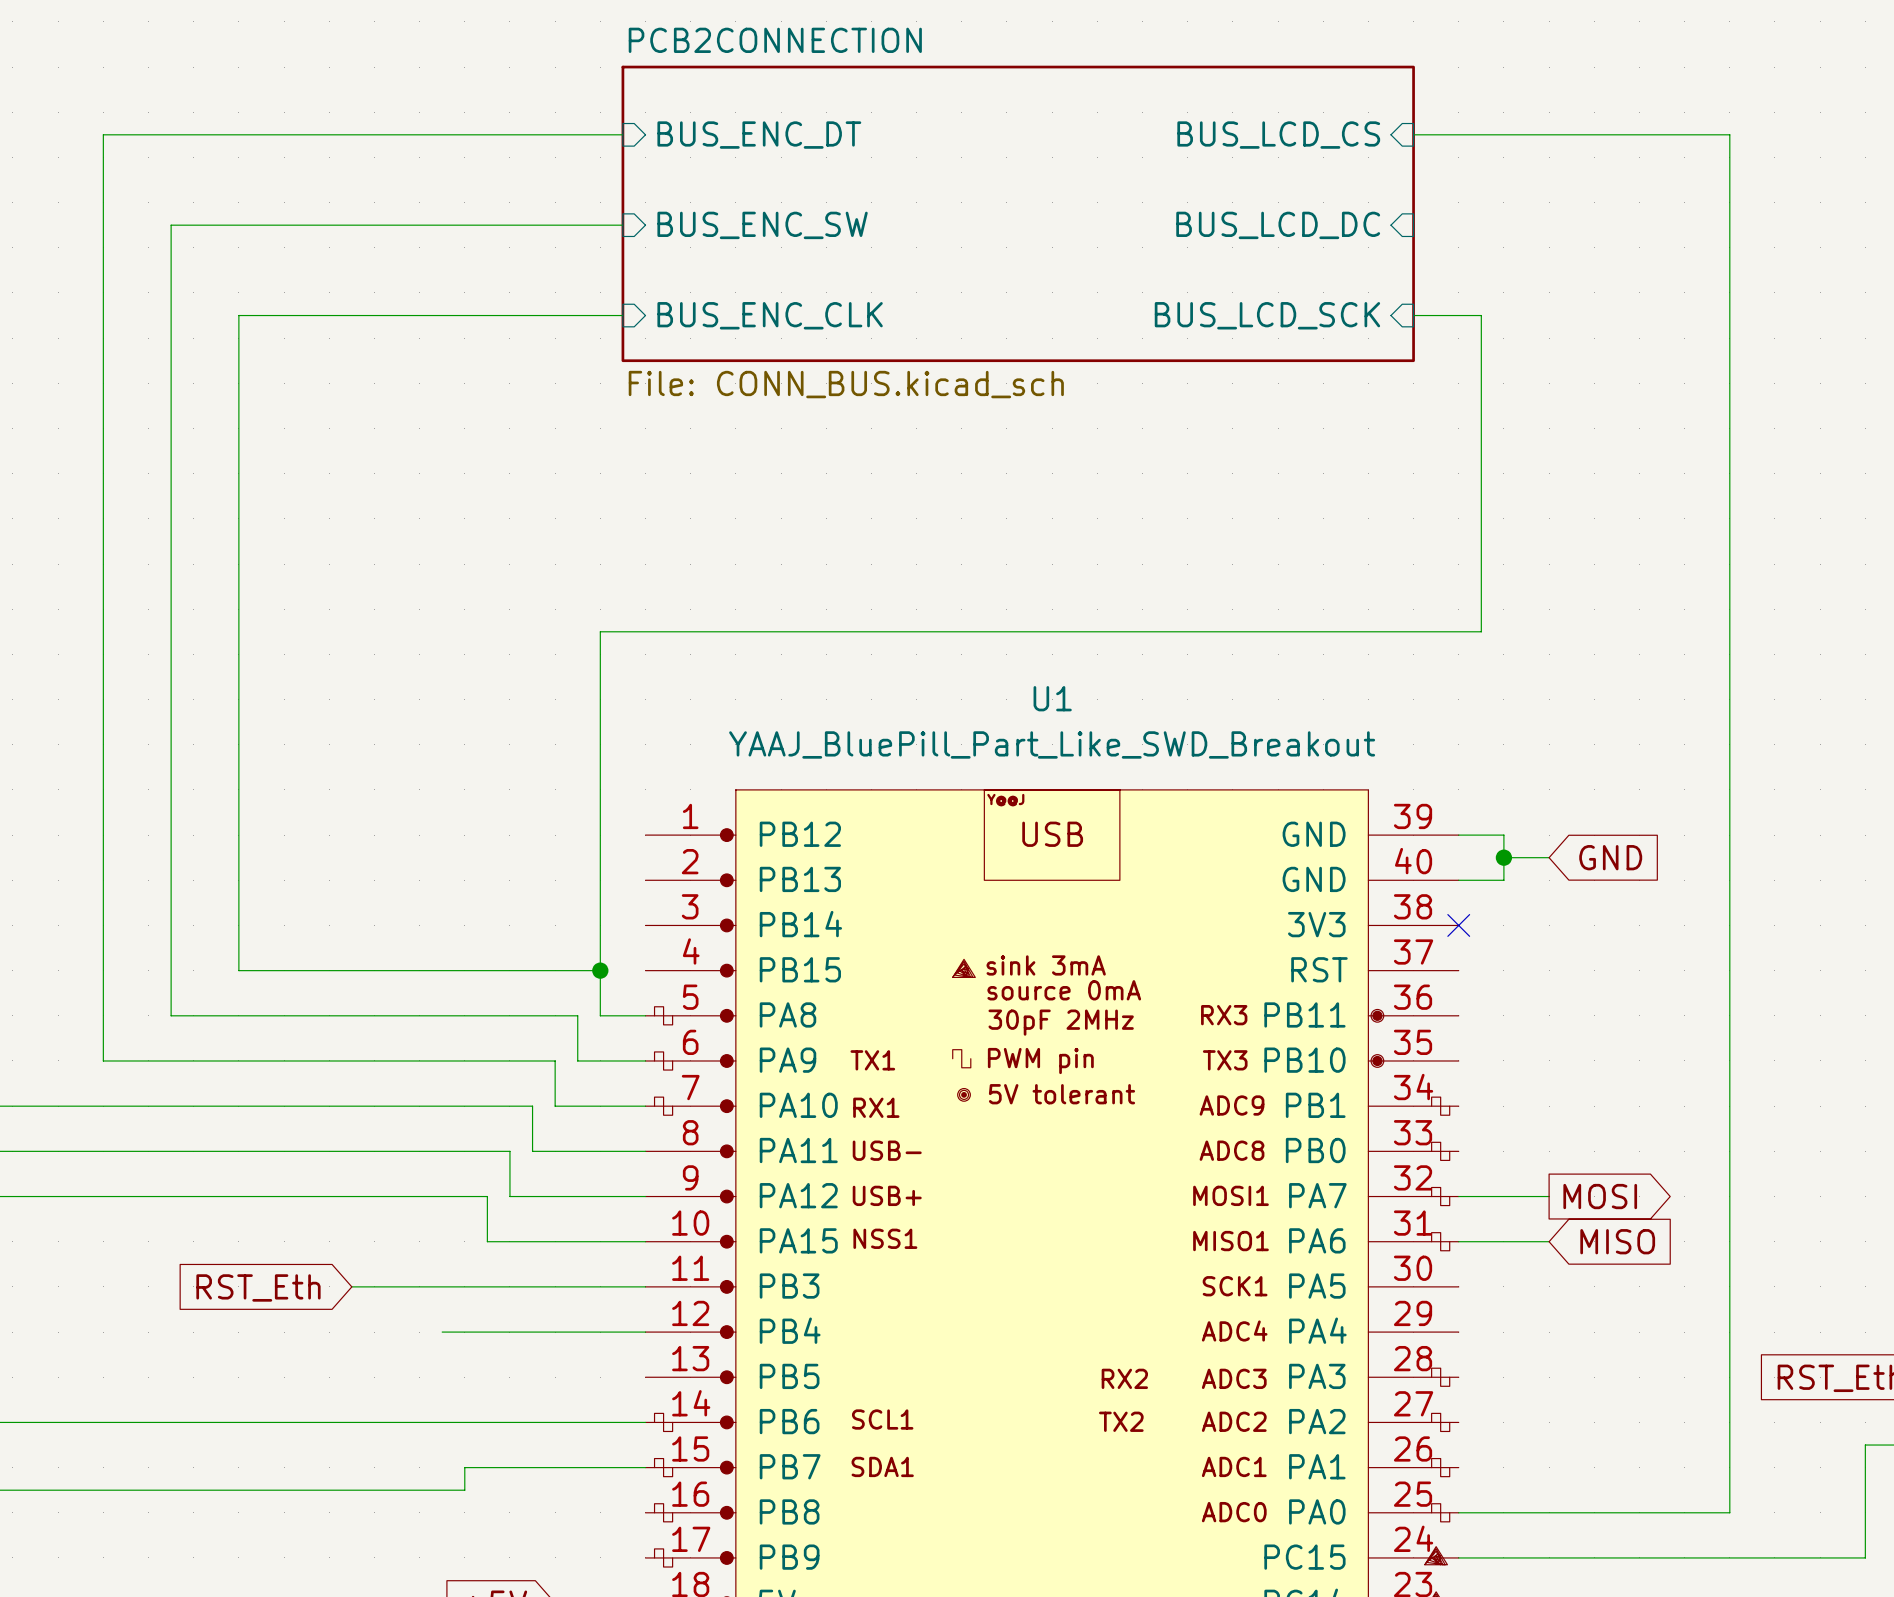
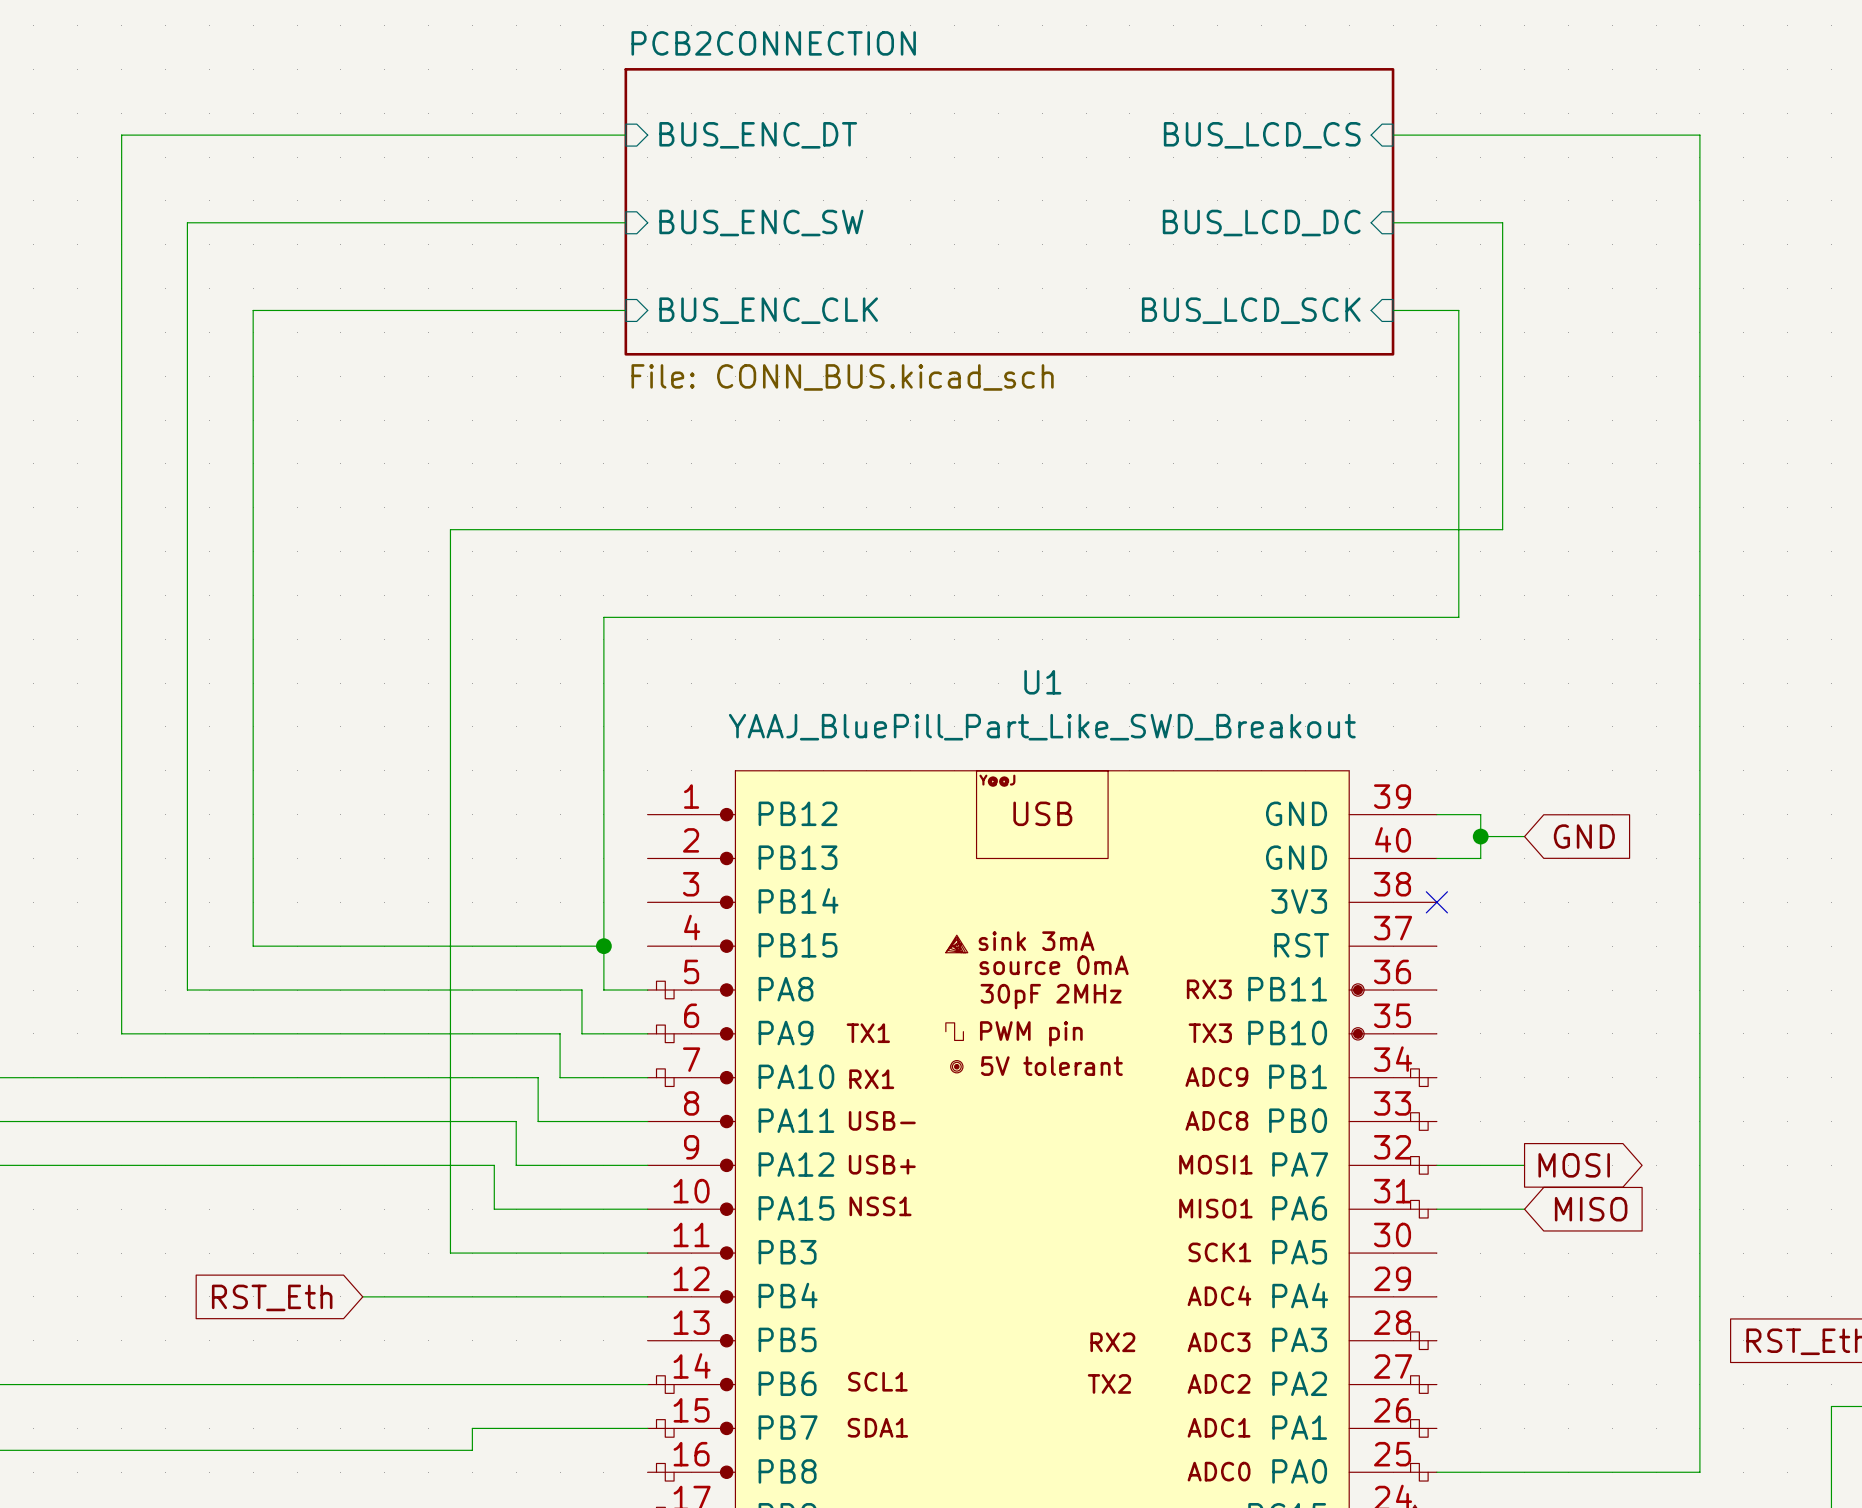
wire: (351, 1286) (442, 1286) -> (1393, 222) (1502, 222) (1502, 529) (450, 529) (450, 1253)
global label position: RST_Eth (258, 1287) -> RST_Eth (272, 1297)
wire: none -> (362, 1296) (450, 1296)

